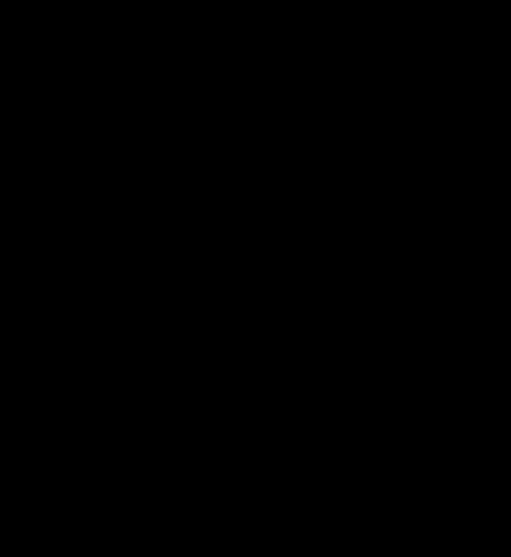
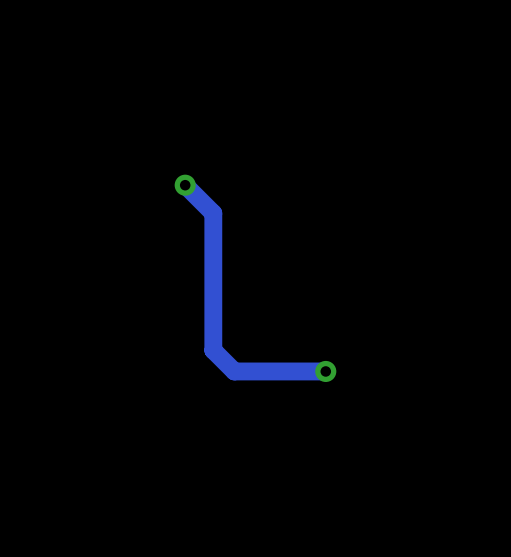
track: none -> (185, 185) (213, 213) (213, 350) (234, 371) (325, 371)
via: none -> (185, 185)
via: none -> (325, 371)

